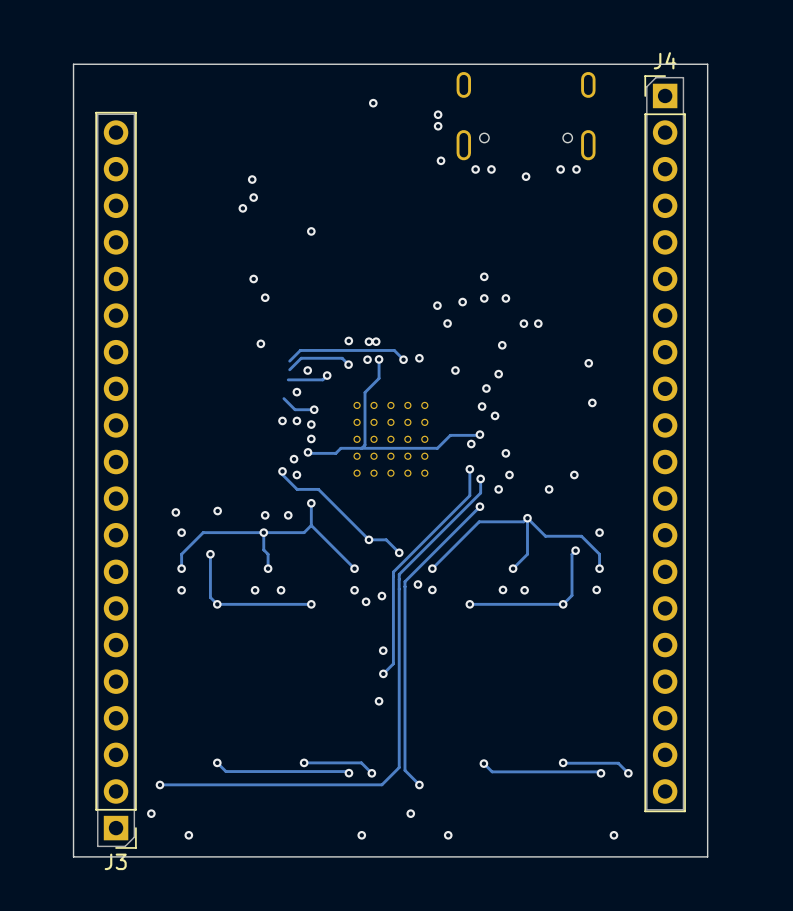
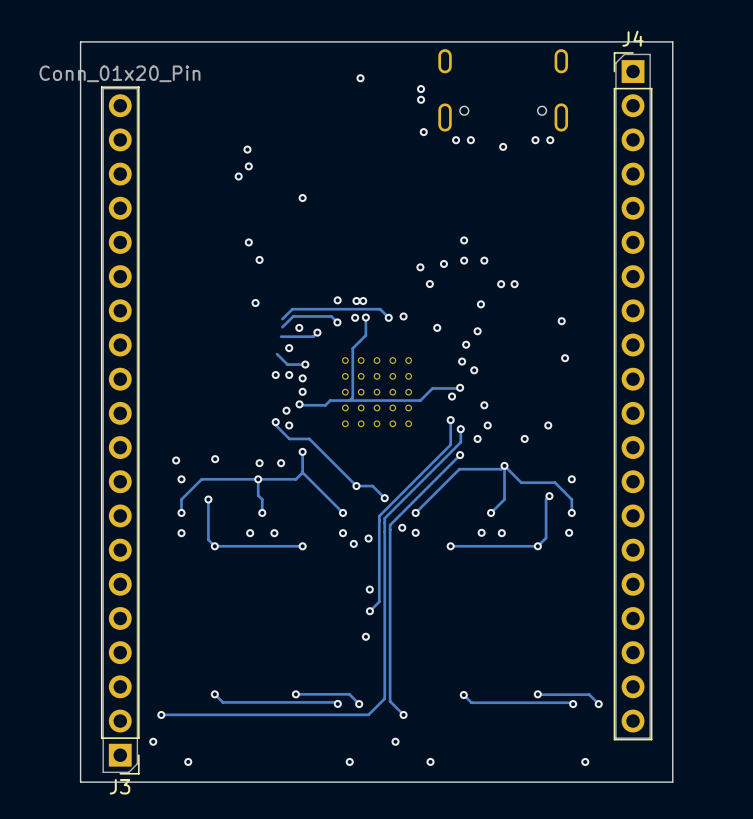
J3 value: none -> Conn_01x20_Pin (119, 73)

